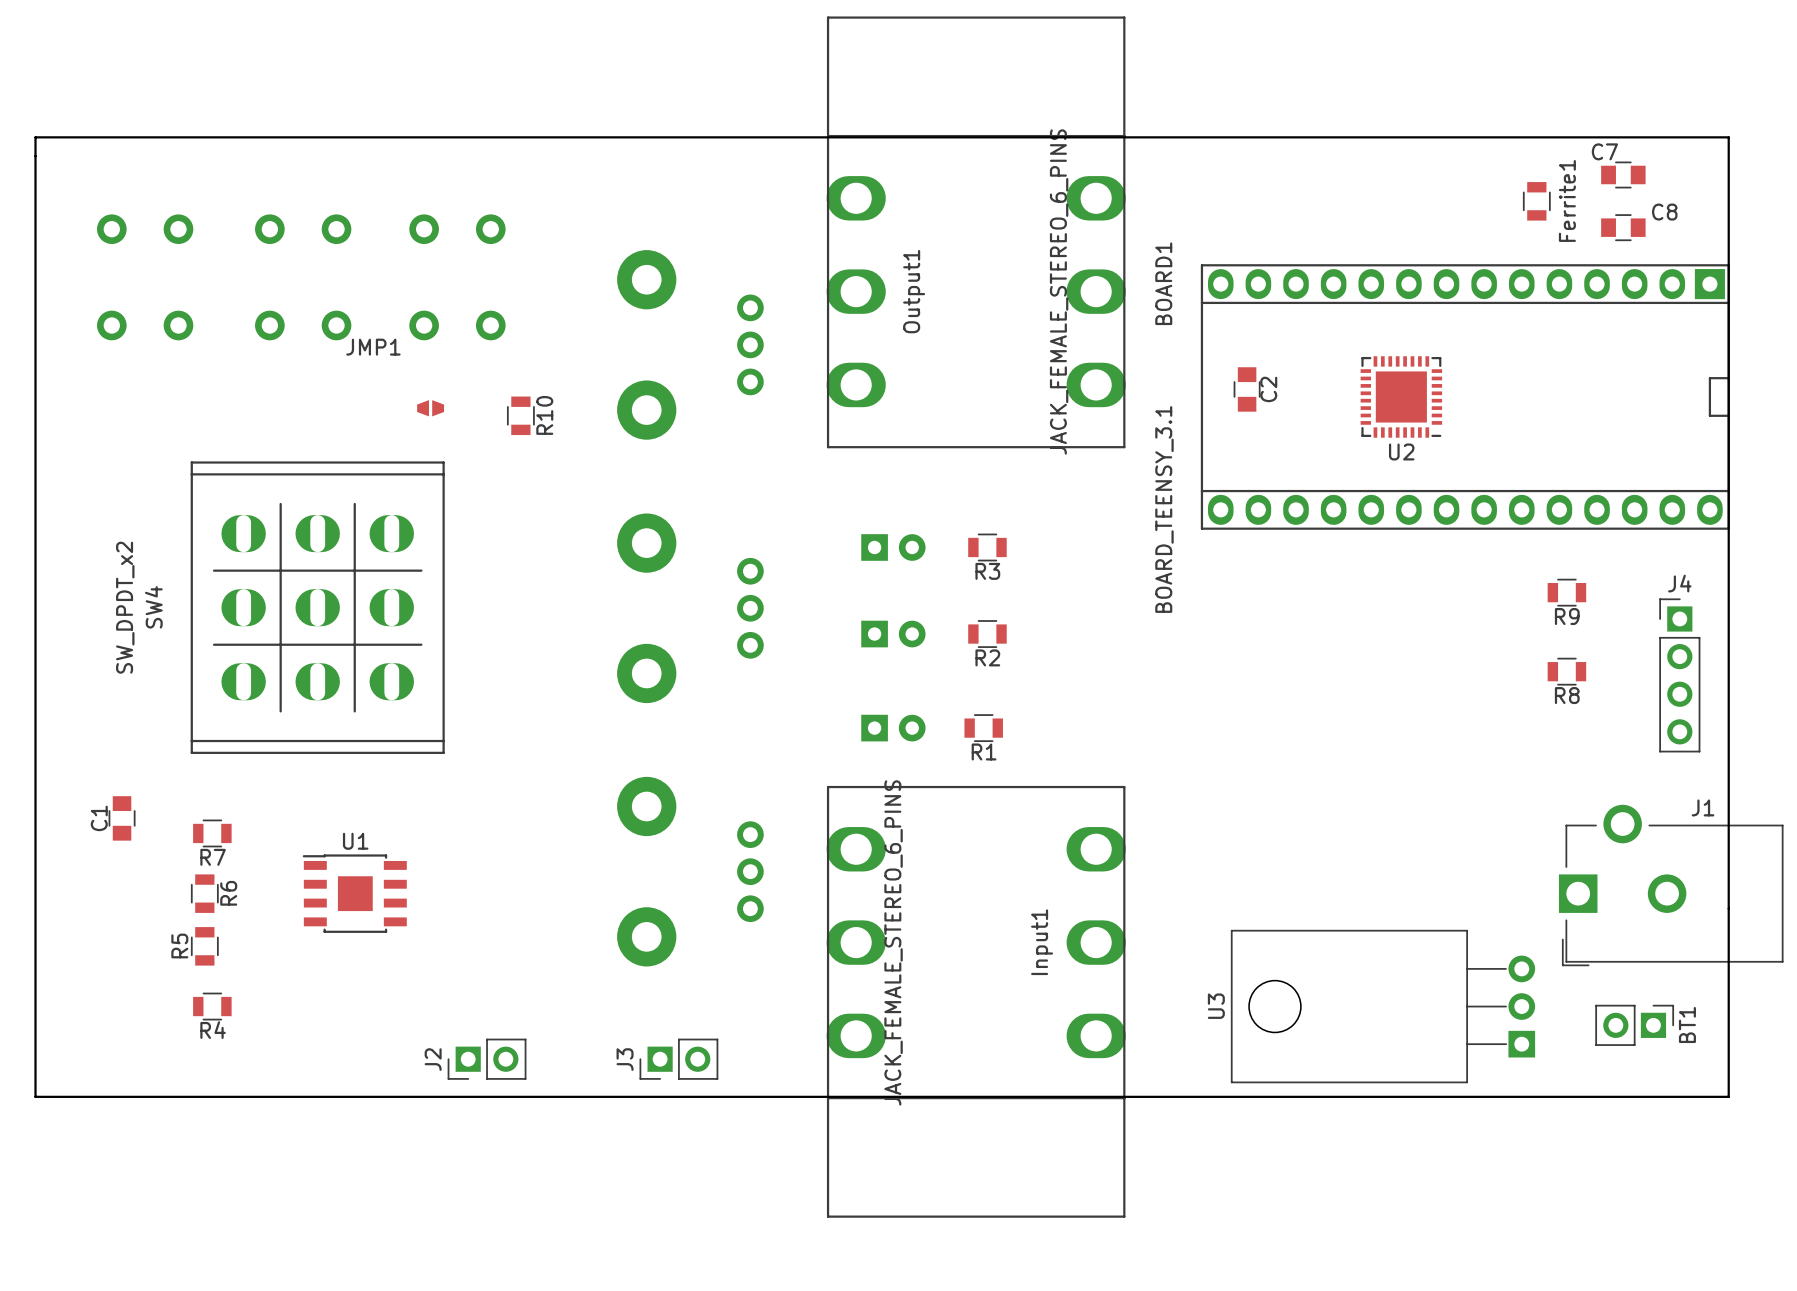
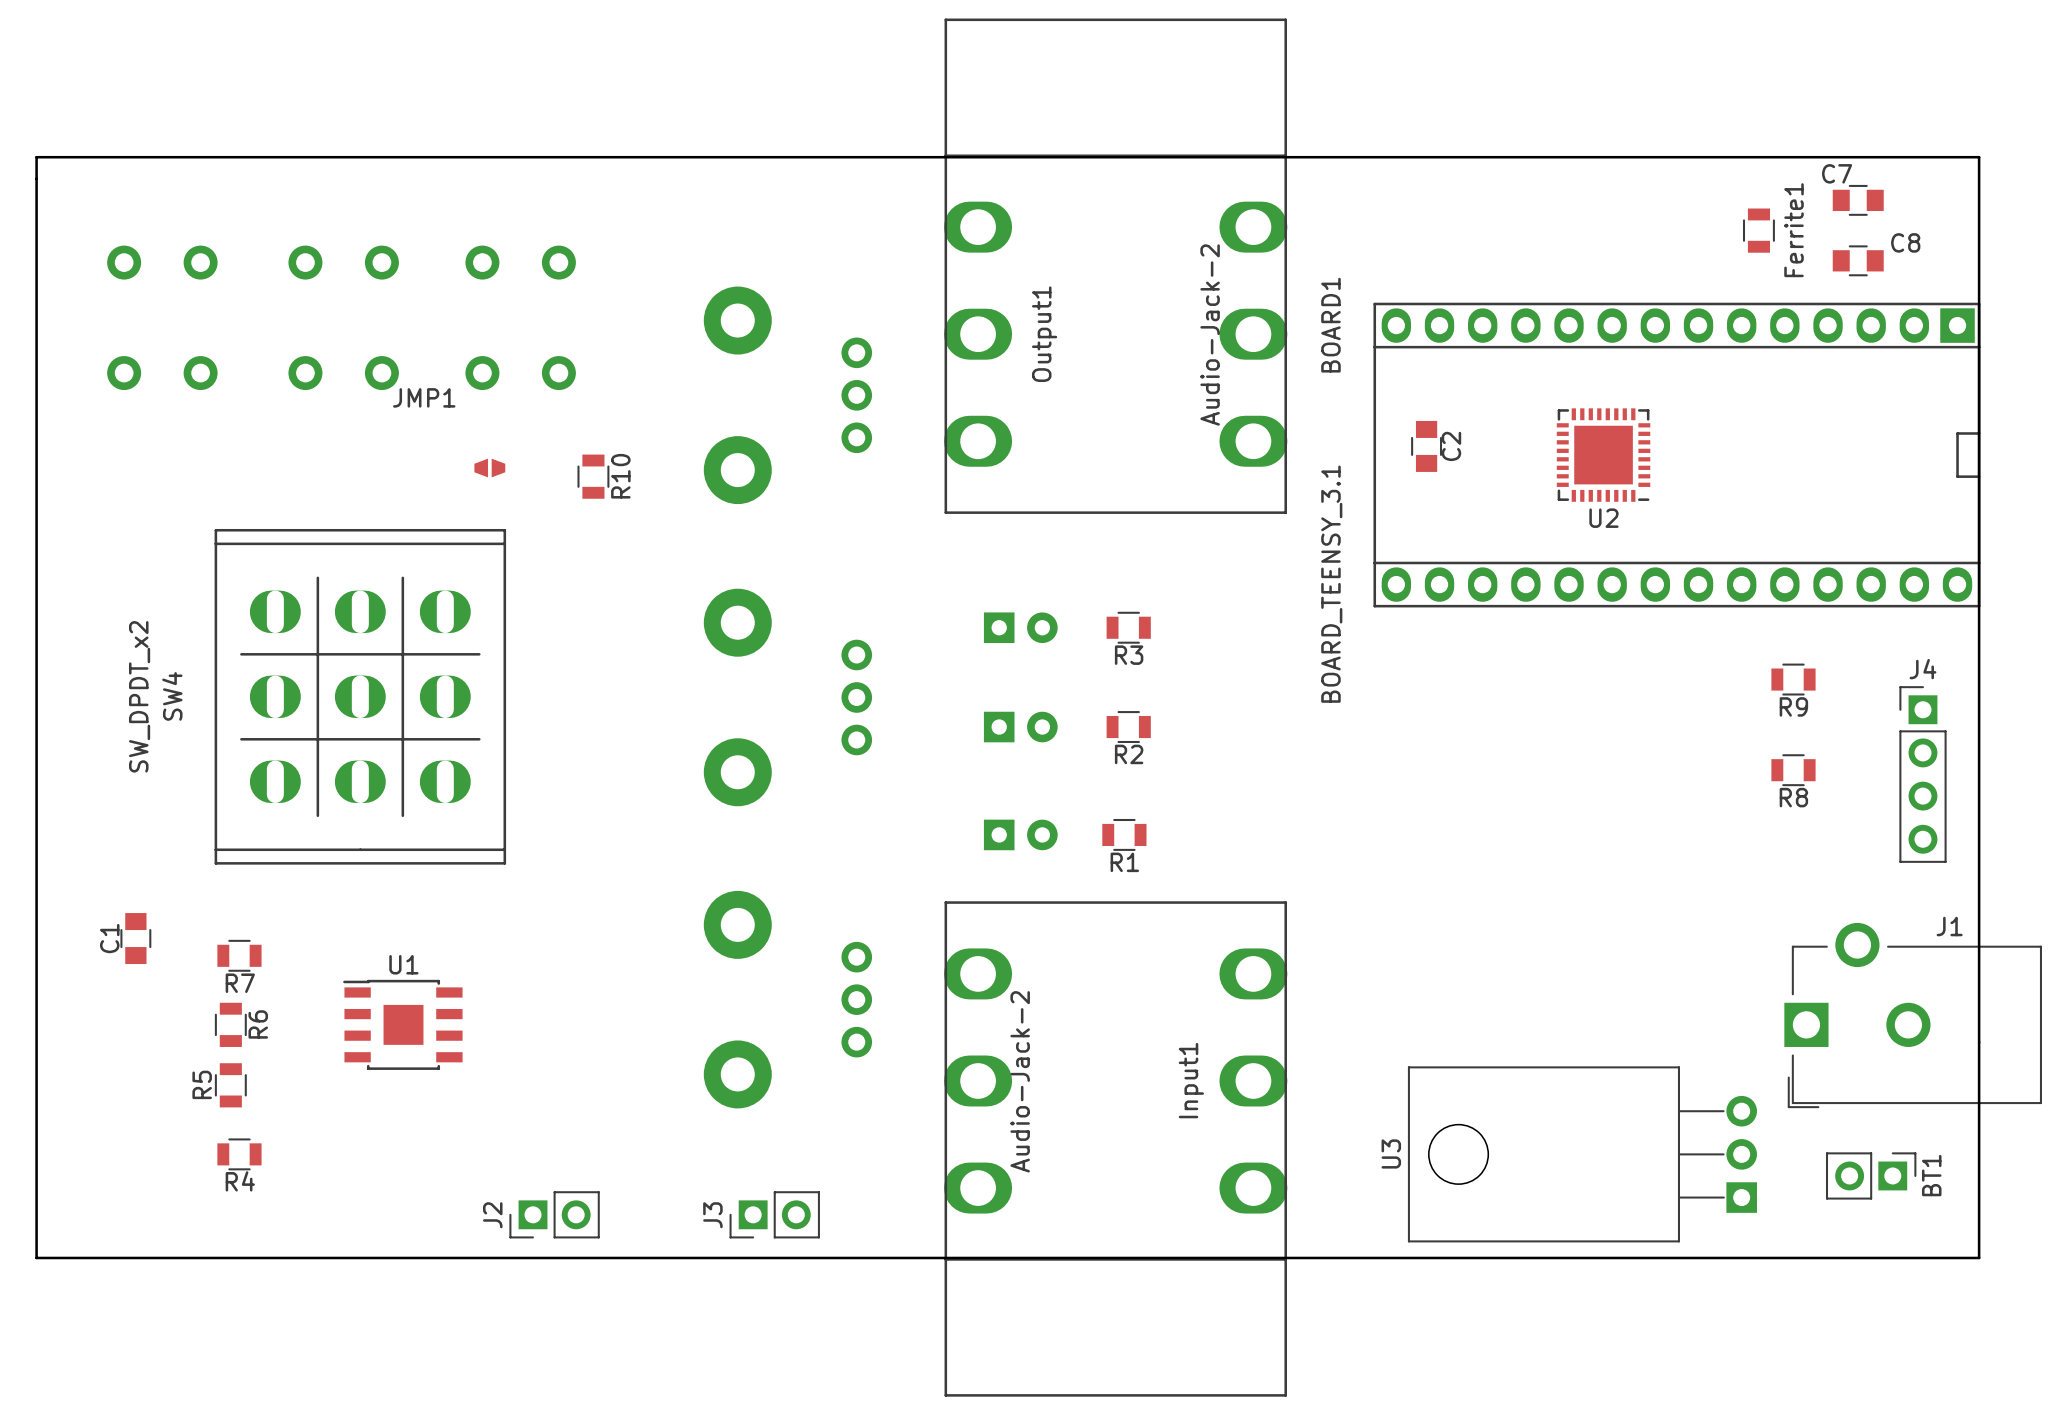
Output1 value: JACK_FEMALE_STEREO_6_PINS (1059, 291) -> Audio-Jack-2 (1210, 335)
Input1 value: JACK_FEMALE_STEREO_6_PINS (893, 942) -> Audio-Jack-2 (1020, 1081)

